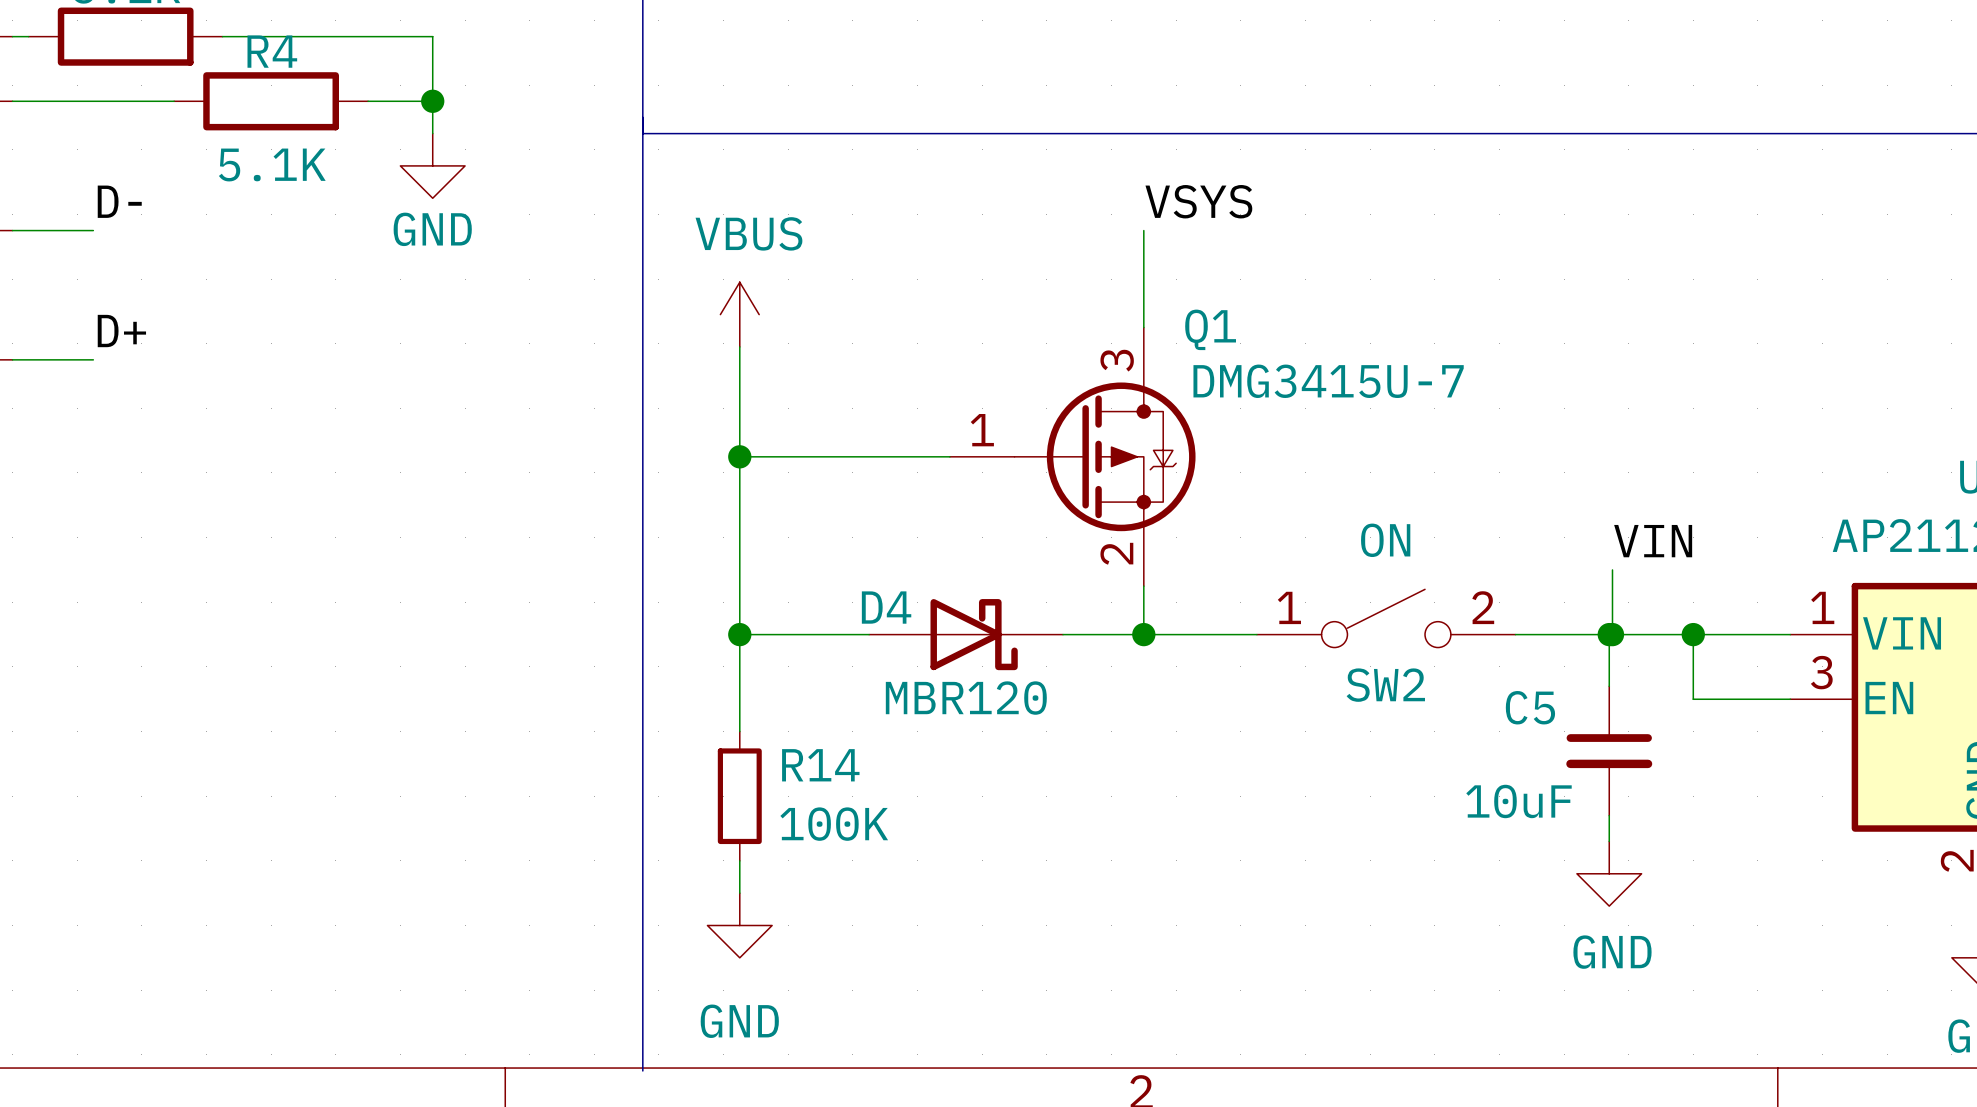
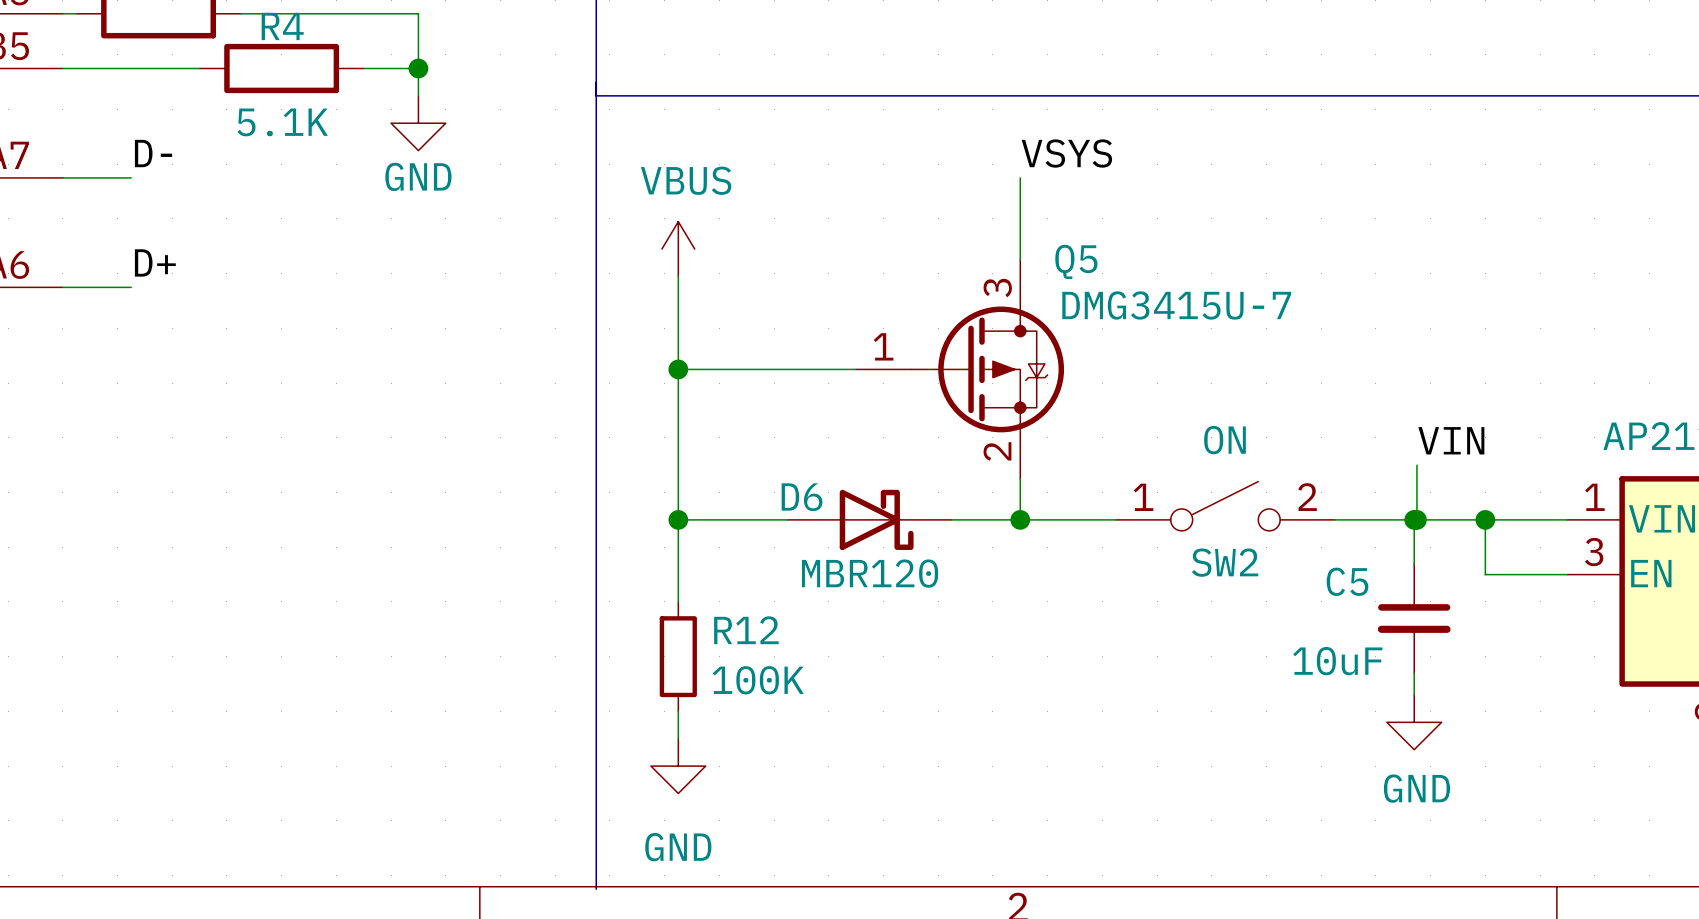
Q1 name: Q1 (1210, 329) -> Q5 (1076, 261)
D4 name: D4 (886, 607) -> D6 (802, 497)
R14 name: R14 (820, 765) -> R12 (746, 630)

